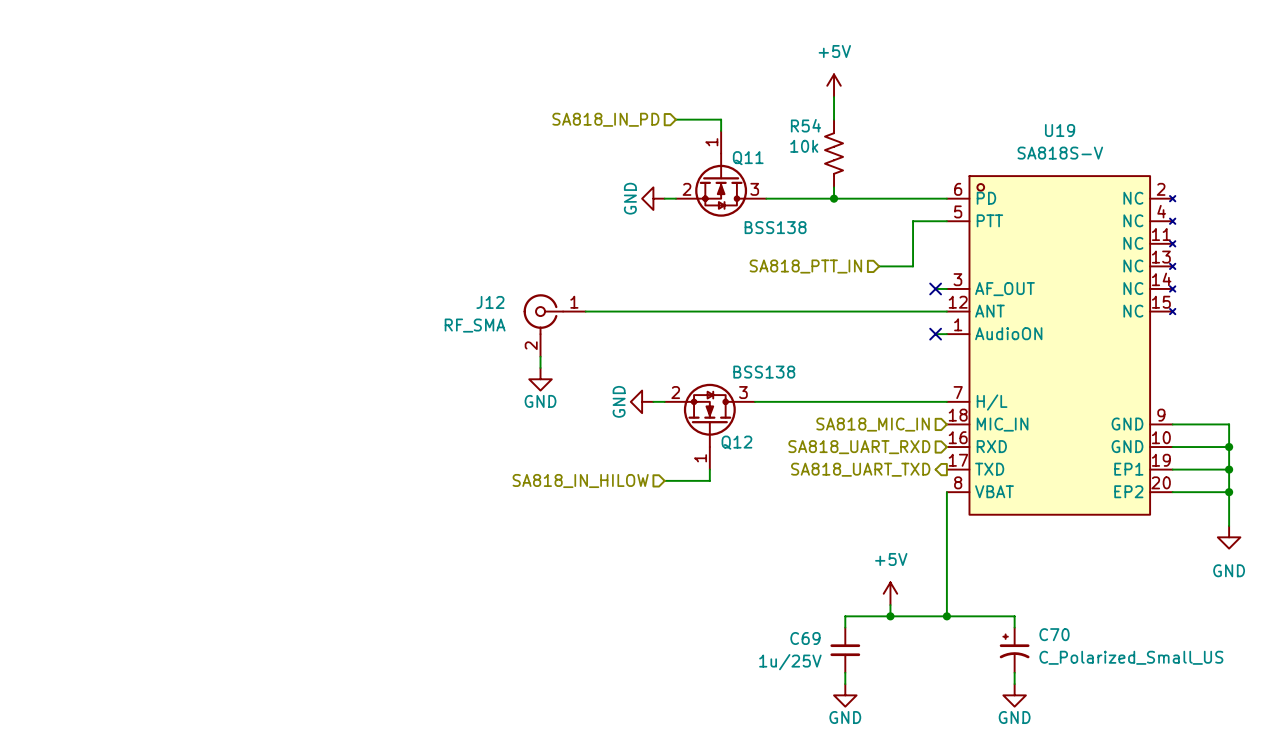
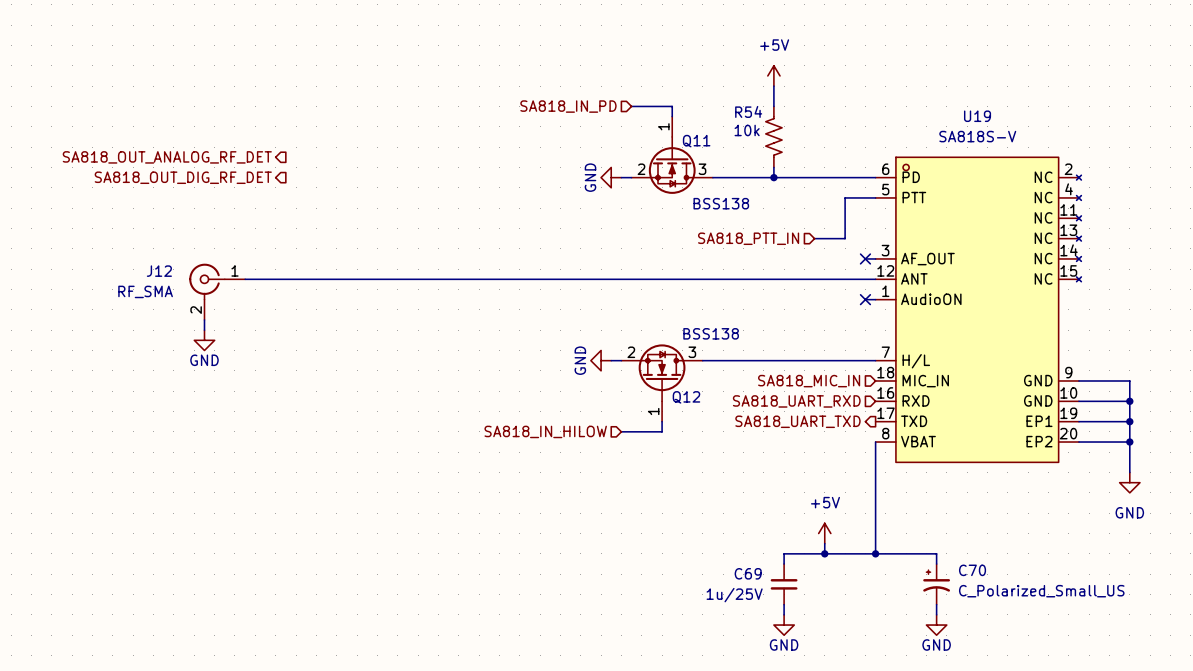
hierarchical label: none -> SA818_OUT_ANALOG_RF_DET (167, 157)
hierarchical label: none -> SA818_OUT_DIG_RF_DET (183, 177)
wire: none -> (245, 279) (550, 279)
J12 position: (554, 325) -> (217, 291)
wire: none -> (204, 319) (204, 330)
wire: (540, 356) (540, 367) -> none
power symbol: none -> GND (204, 340)
power symbol: GND (540, 379) -> none

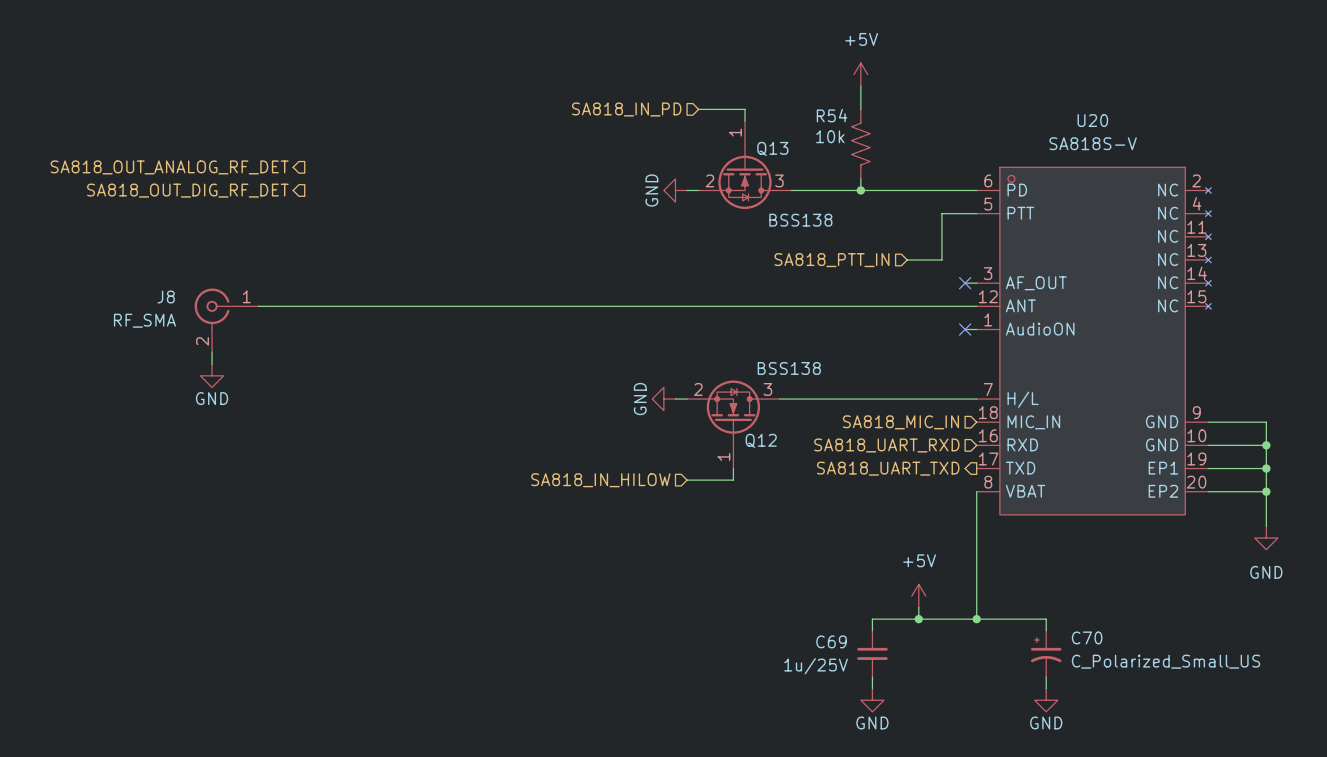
U19 name: U19 (977, 116) -> U20 (1092, 120)
Q11 name: Q11 (696, 141) -> Q13 (772, 148)
J12 name: J12 (159, 271) -> J8 (166, 296)

